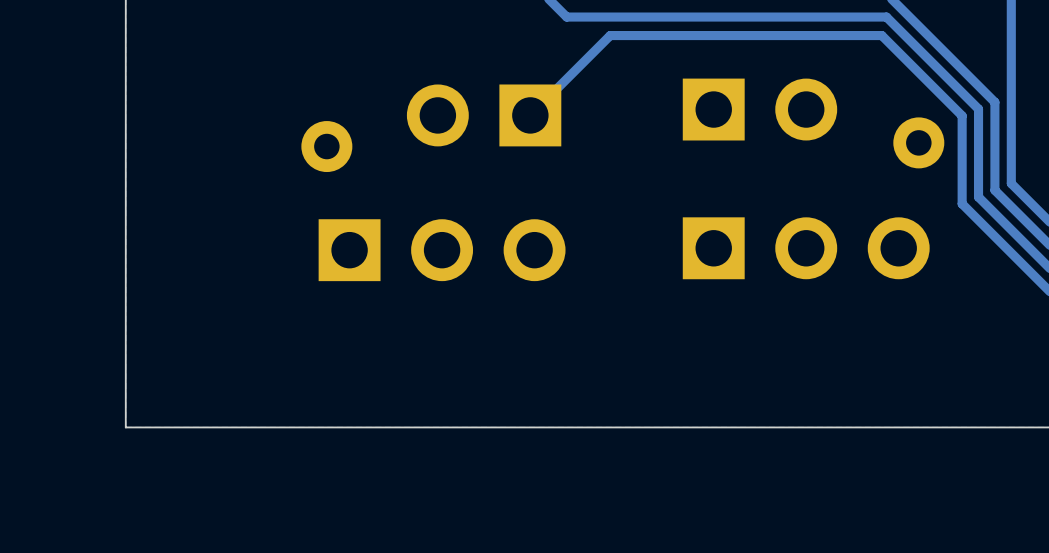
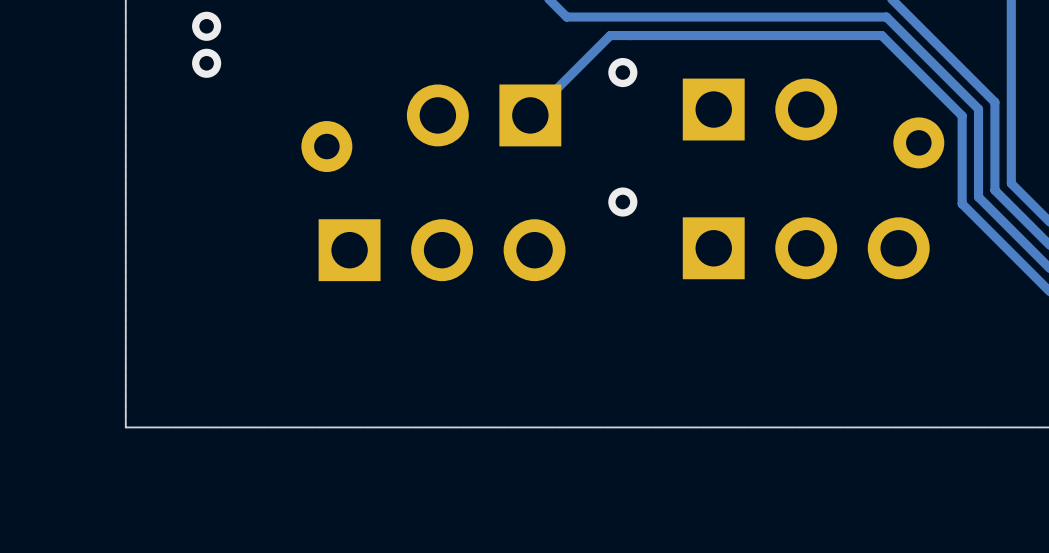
via: none -> (206, 26)
via: none -> (206, 63)
via: none -> (622, 72)
via: none -> (622, 202)

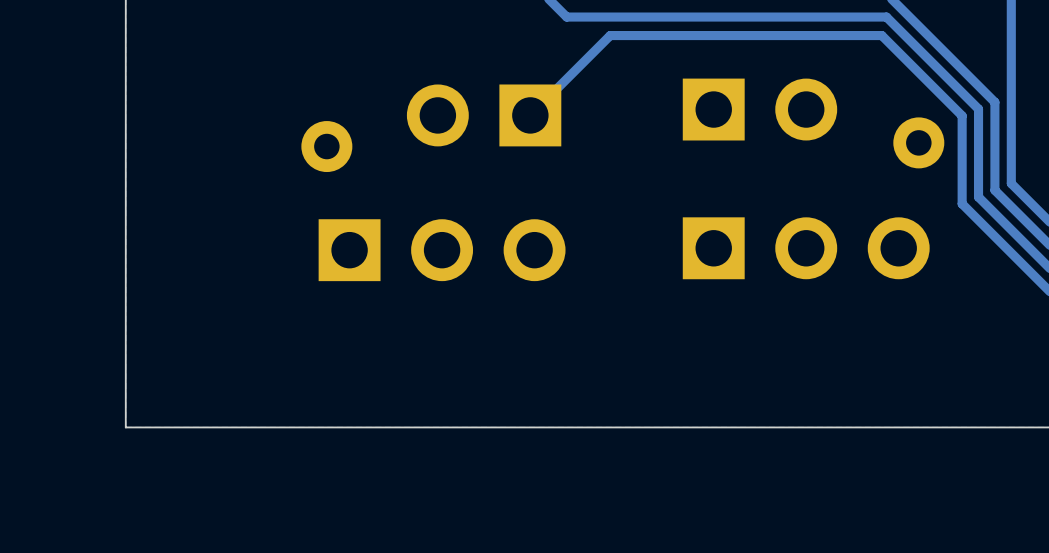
via: (206, 26) -> none
via: (206, 63) -> none
via: (622, 72) -> none
via: (622, 202) -> none

